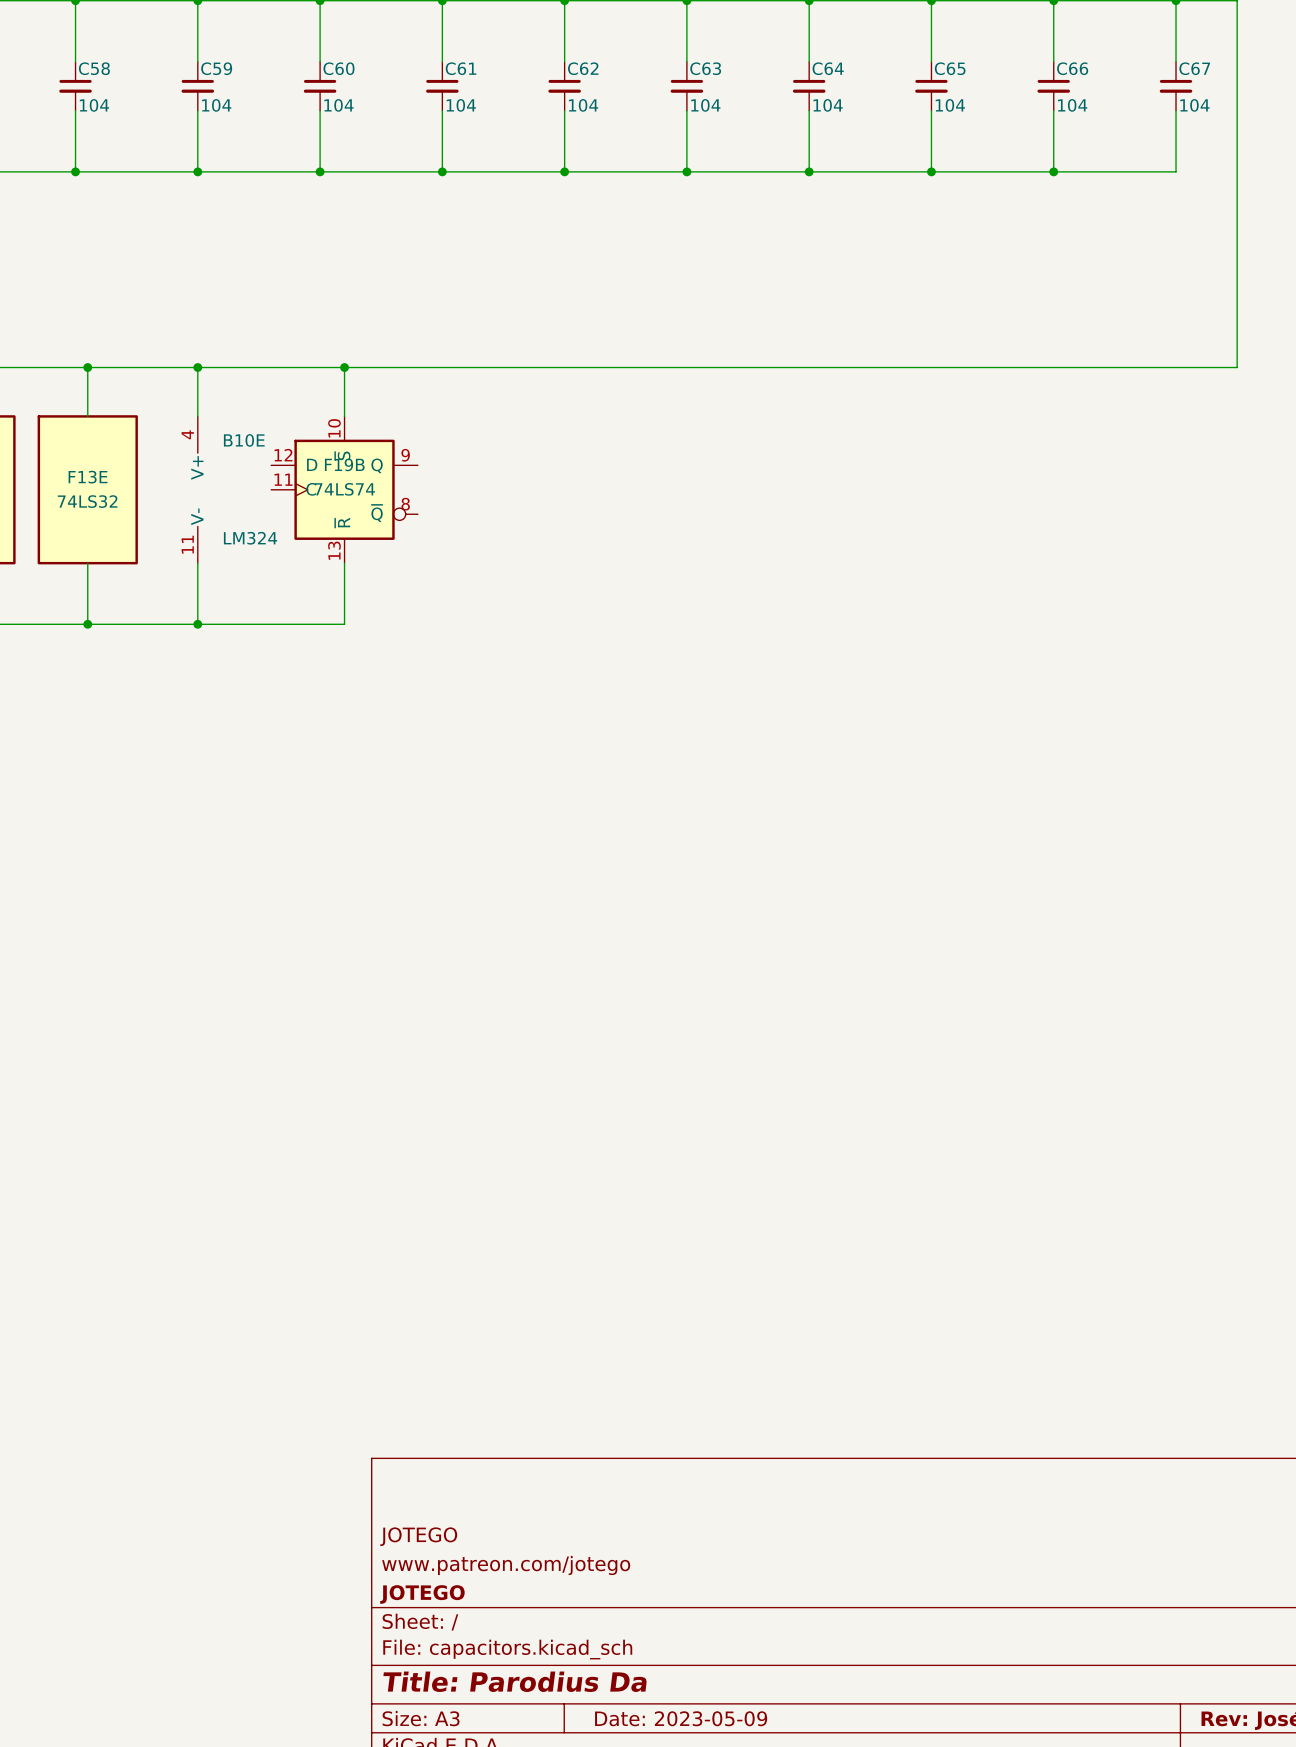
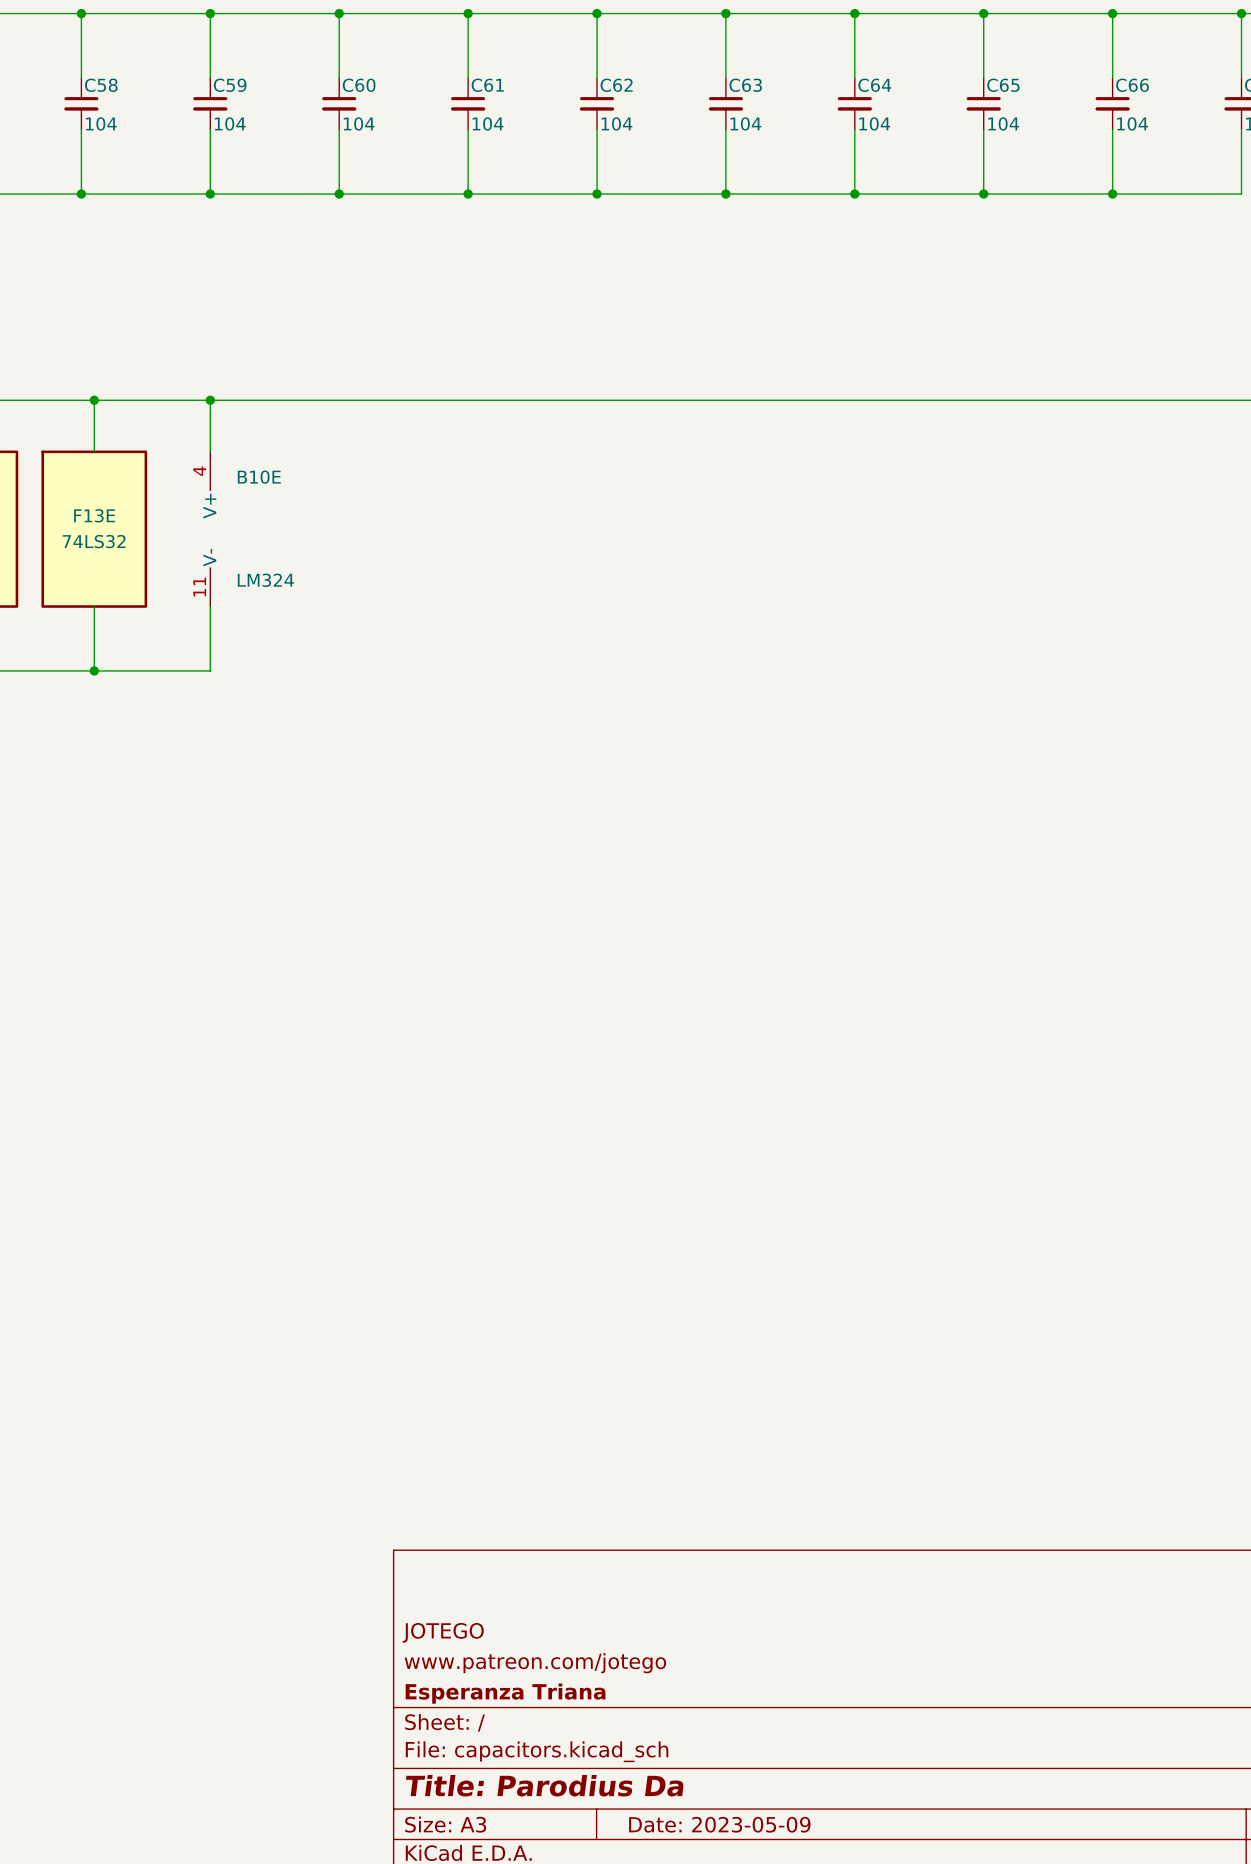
wire: (344, 367) (344, 416) -> none
junction: (344, 367) -> none
F19B: 74LS74 (344, 489) -> none
wire: (344, 563) (344, 624) (197, 624) -> none
junction: (197, 624) -> none
title block: JOTEGO (422, 1594) -> Esperanza Triana (505, 1693)

